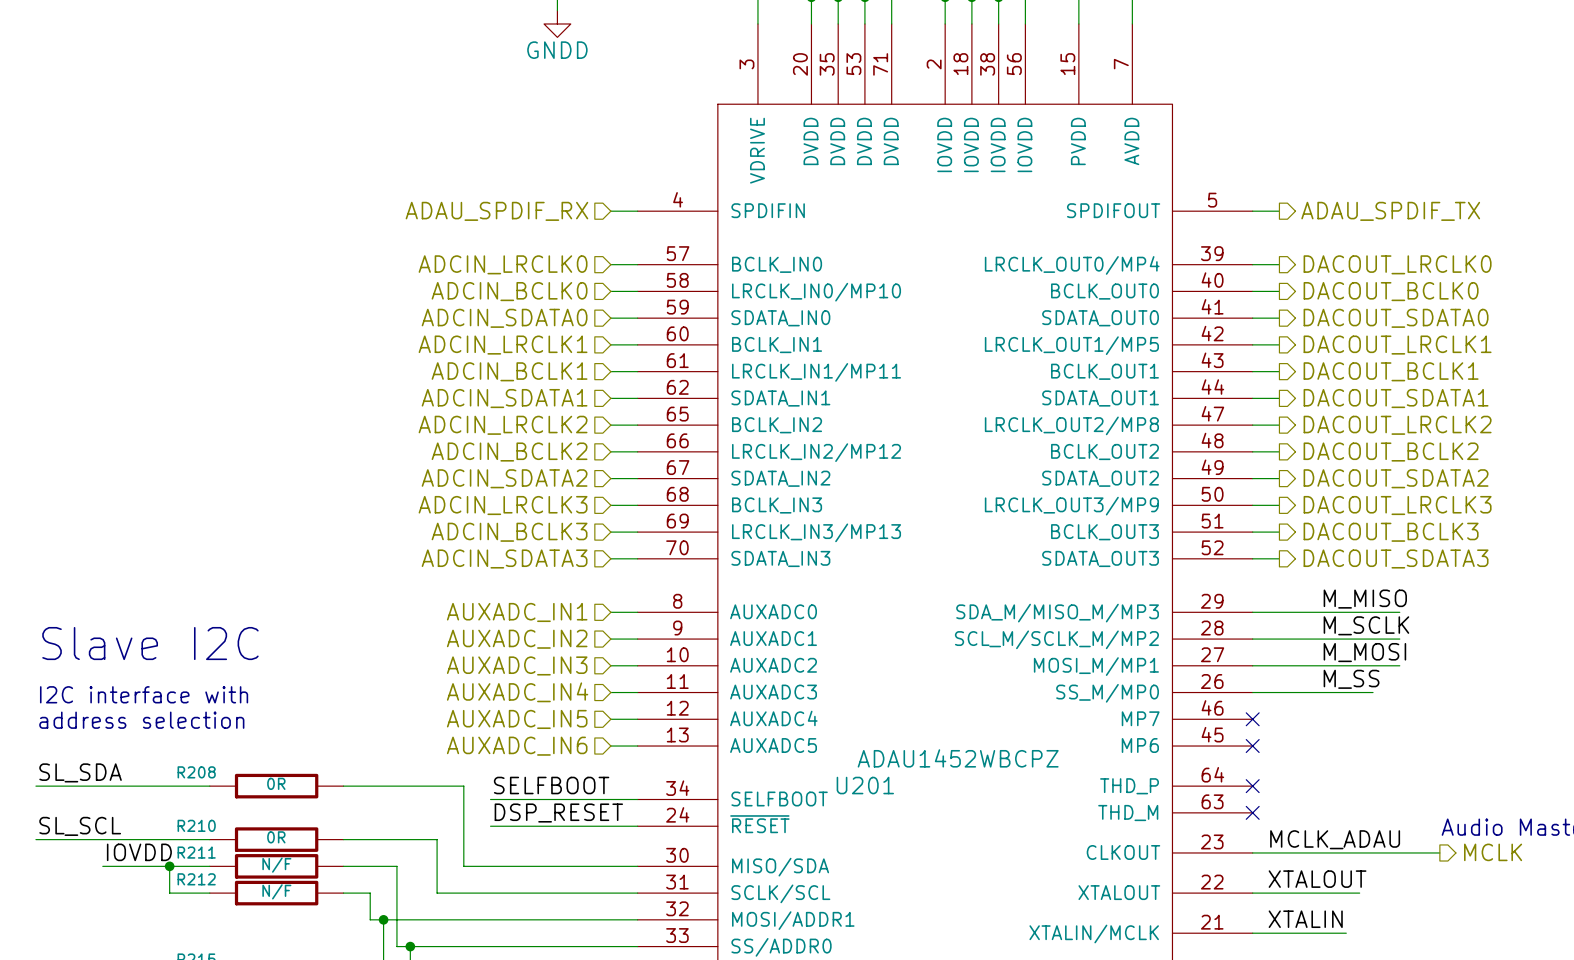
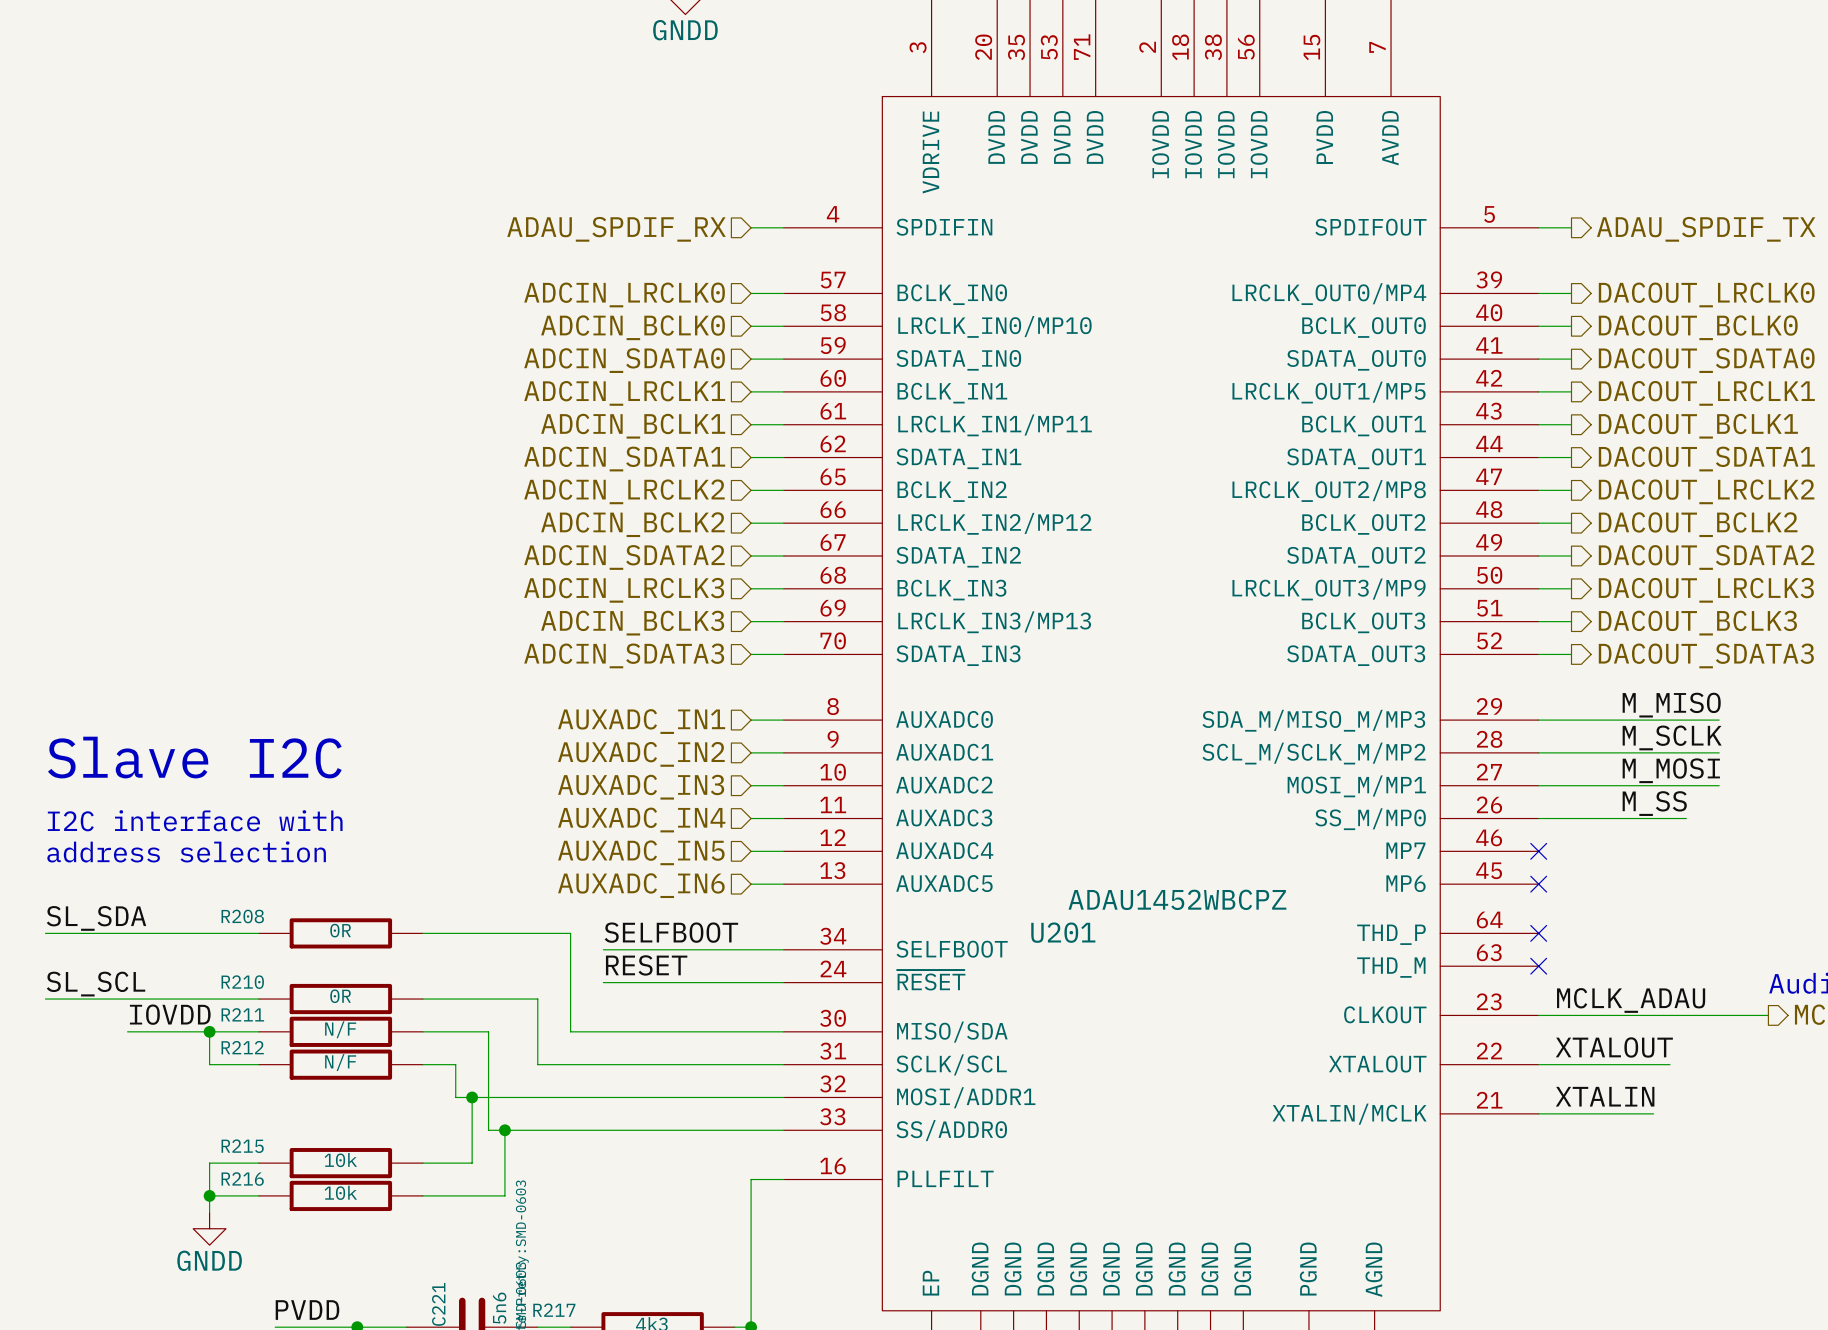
label: DSP_RESET (558, 813) -> RESET (646, 965)

